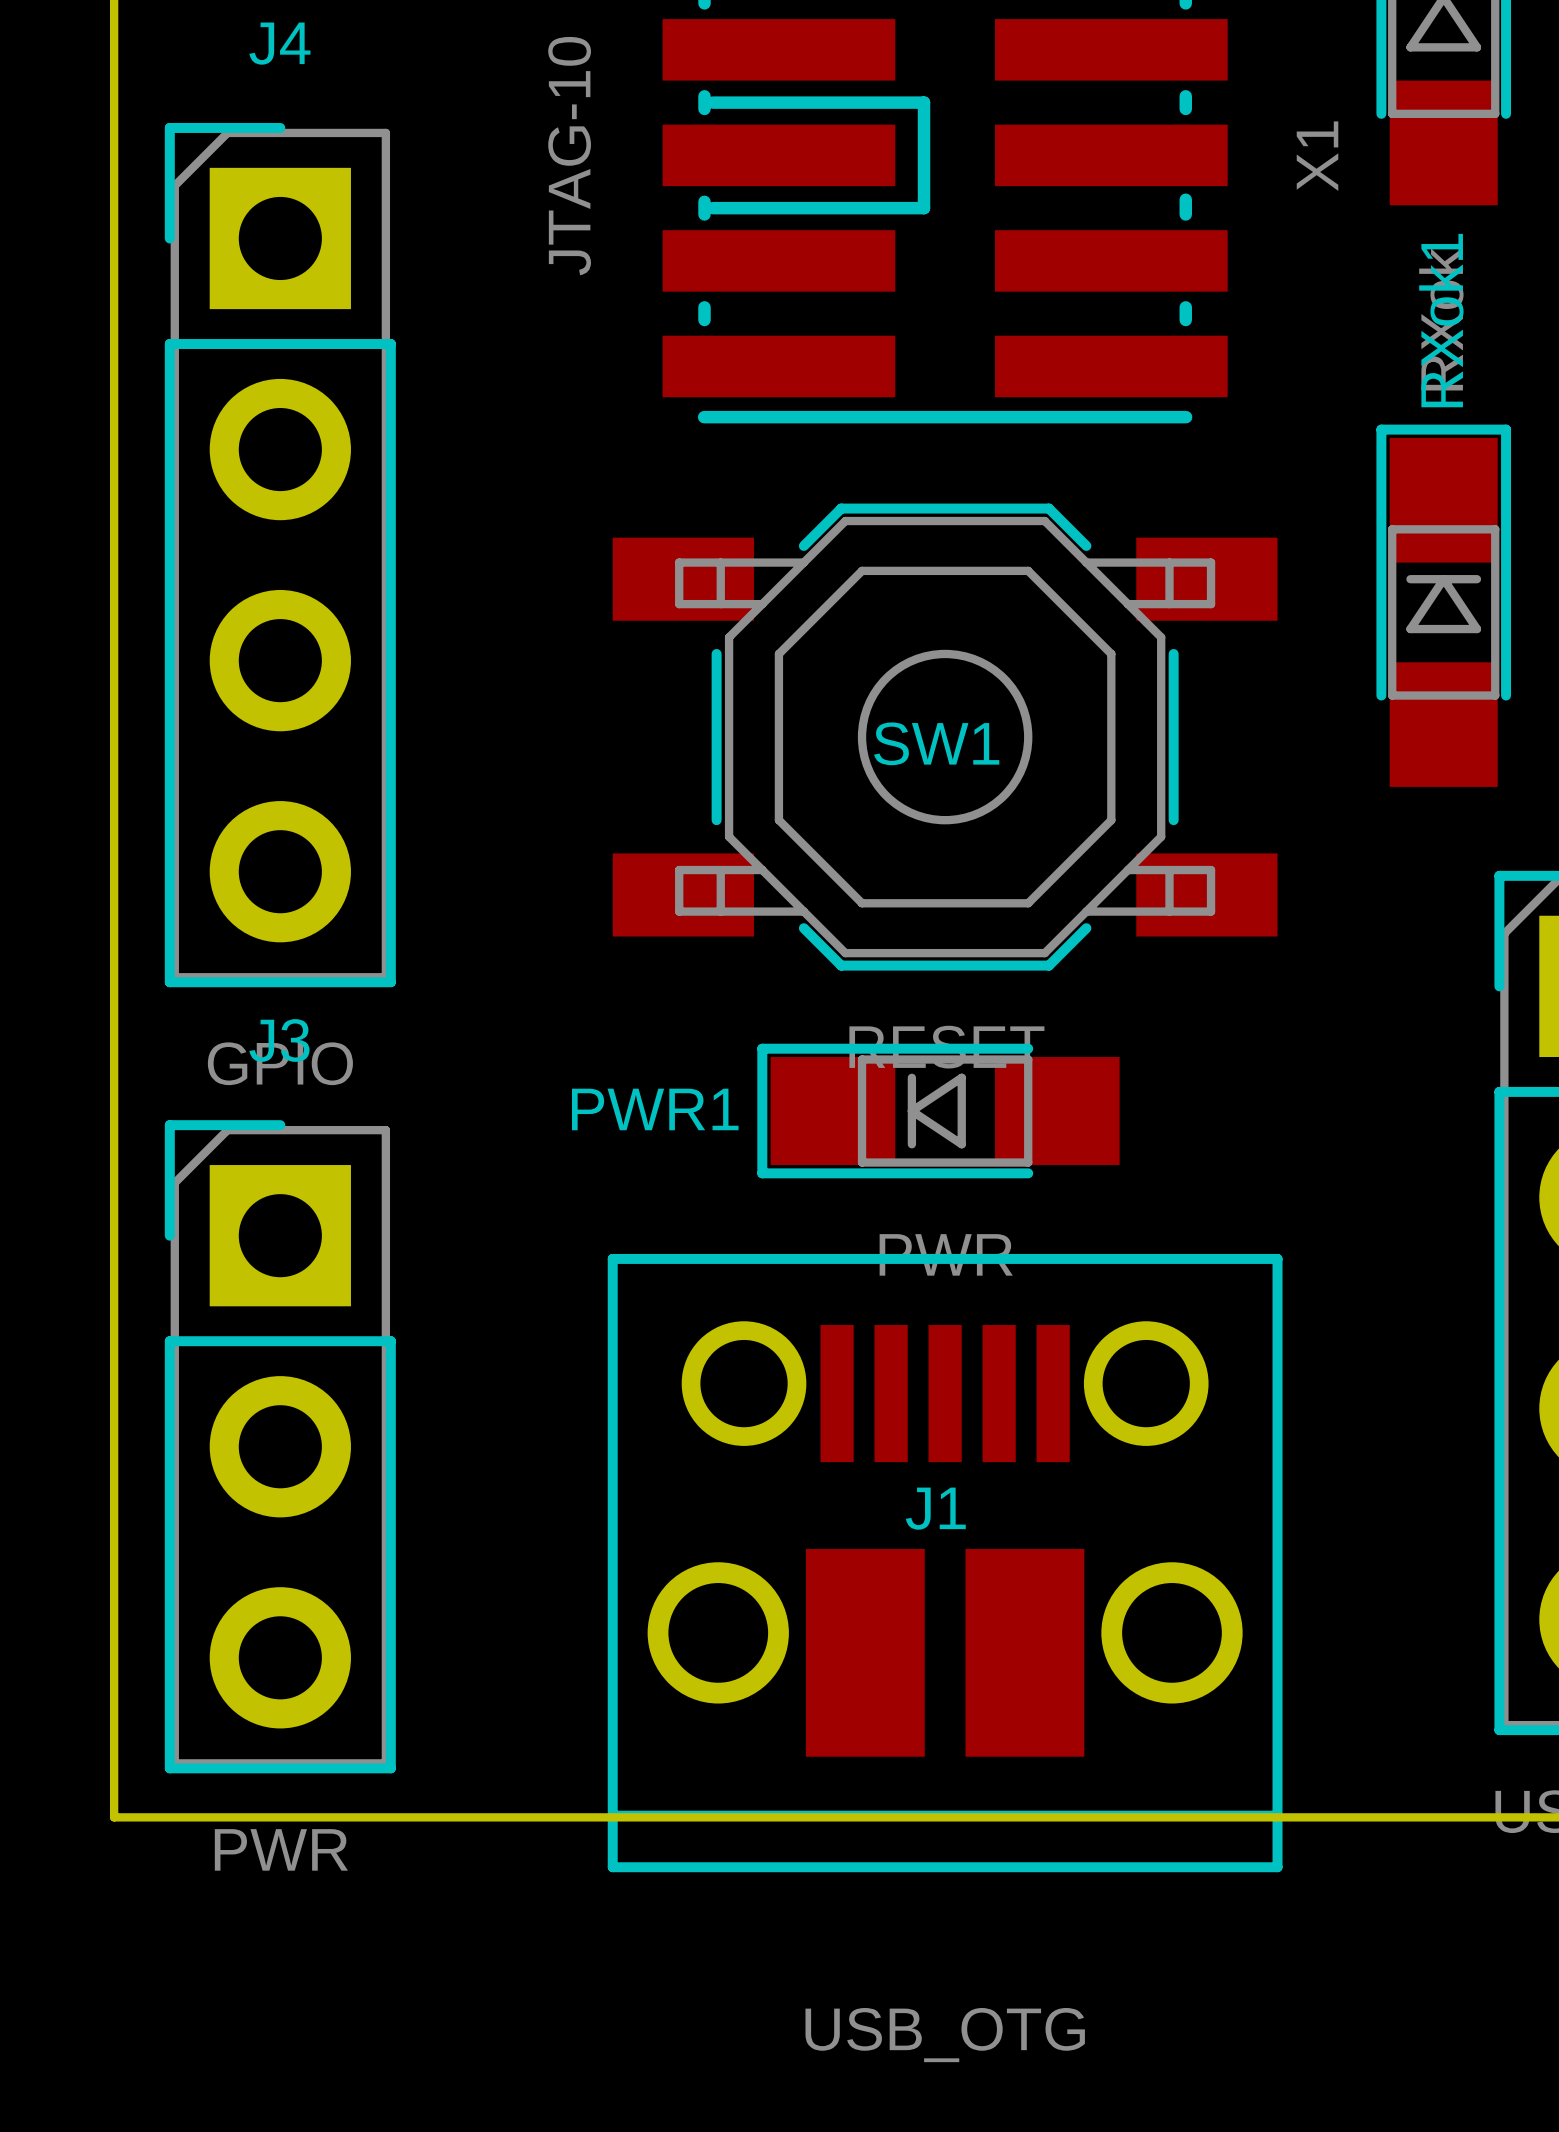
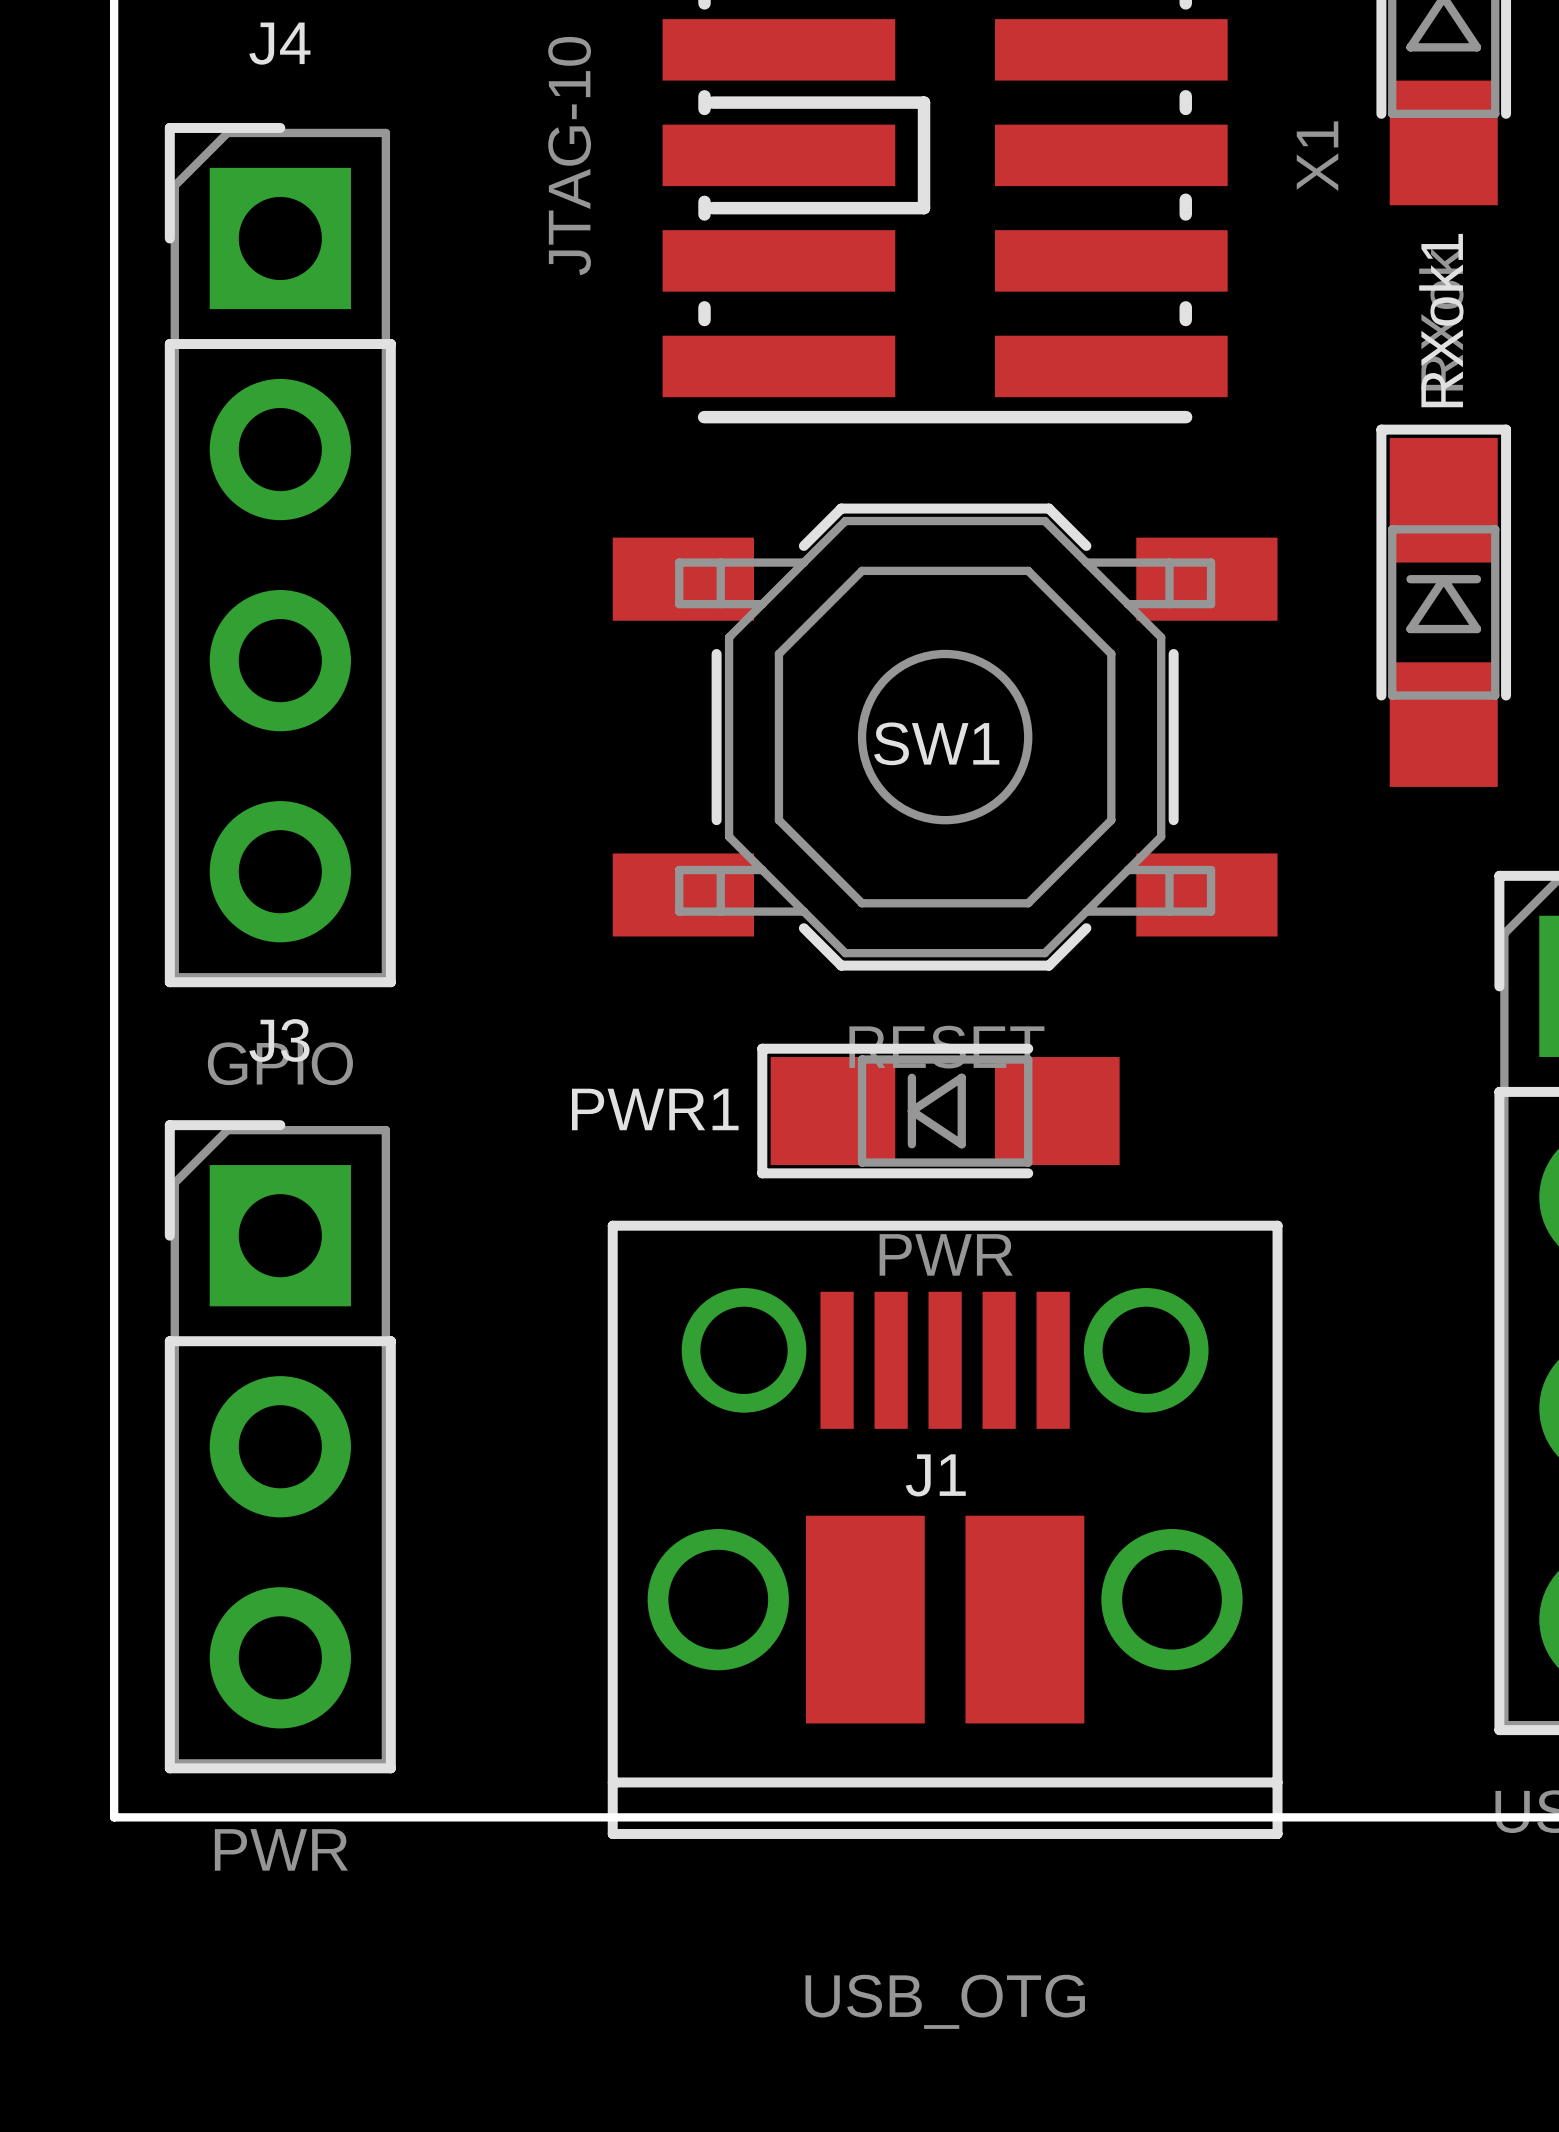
J1 position: (945, 1563) -> (945, 1529)

